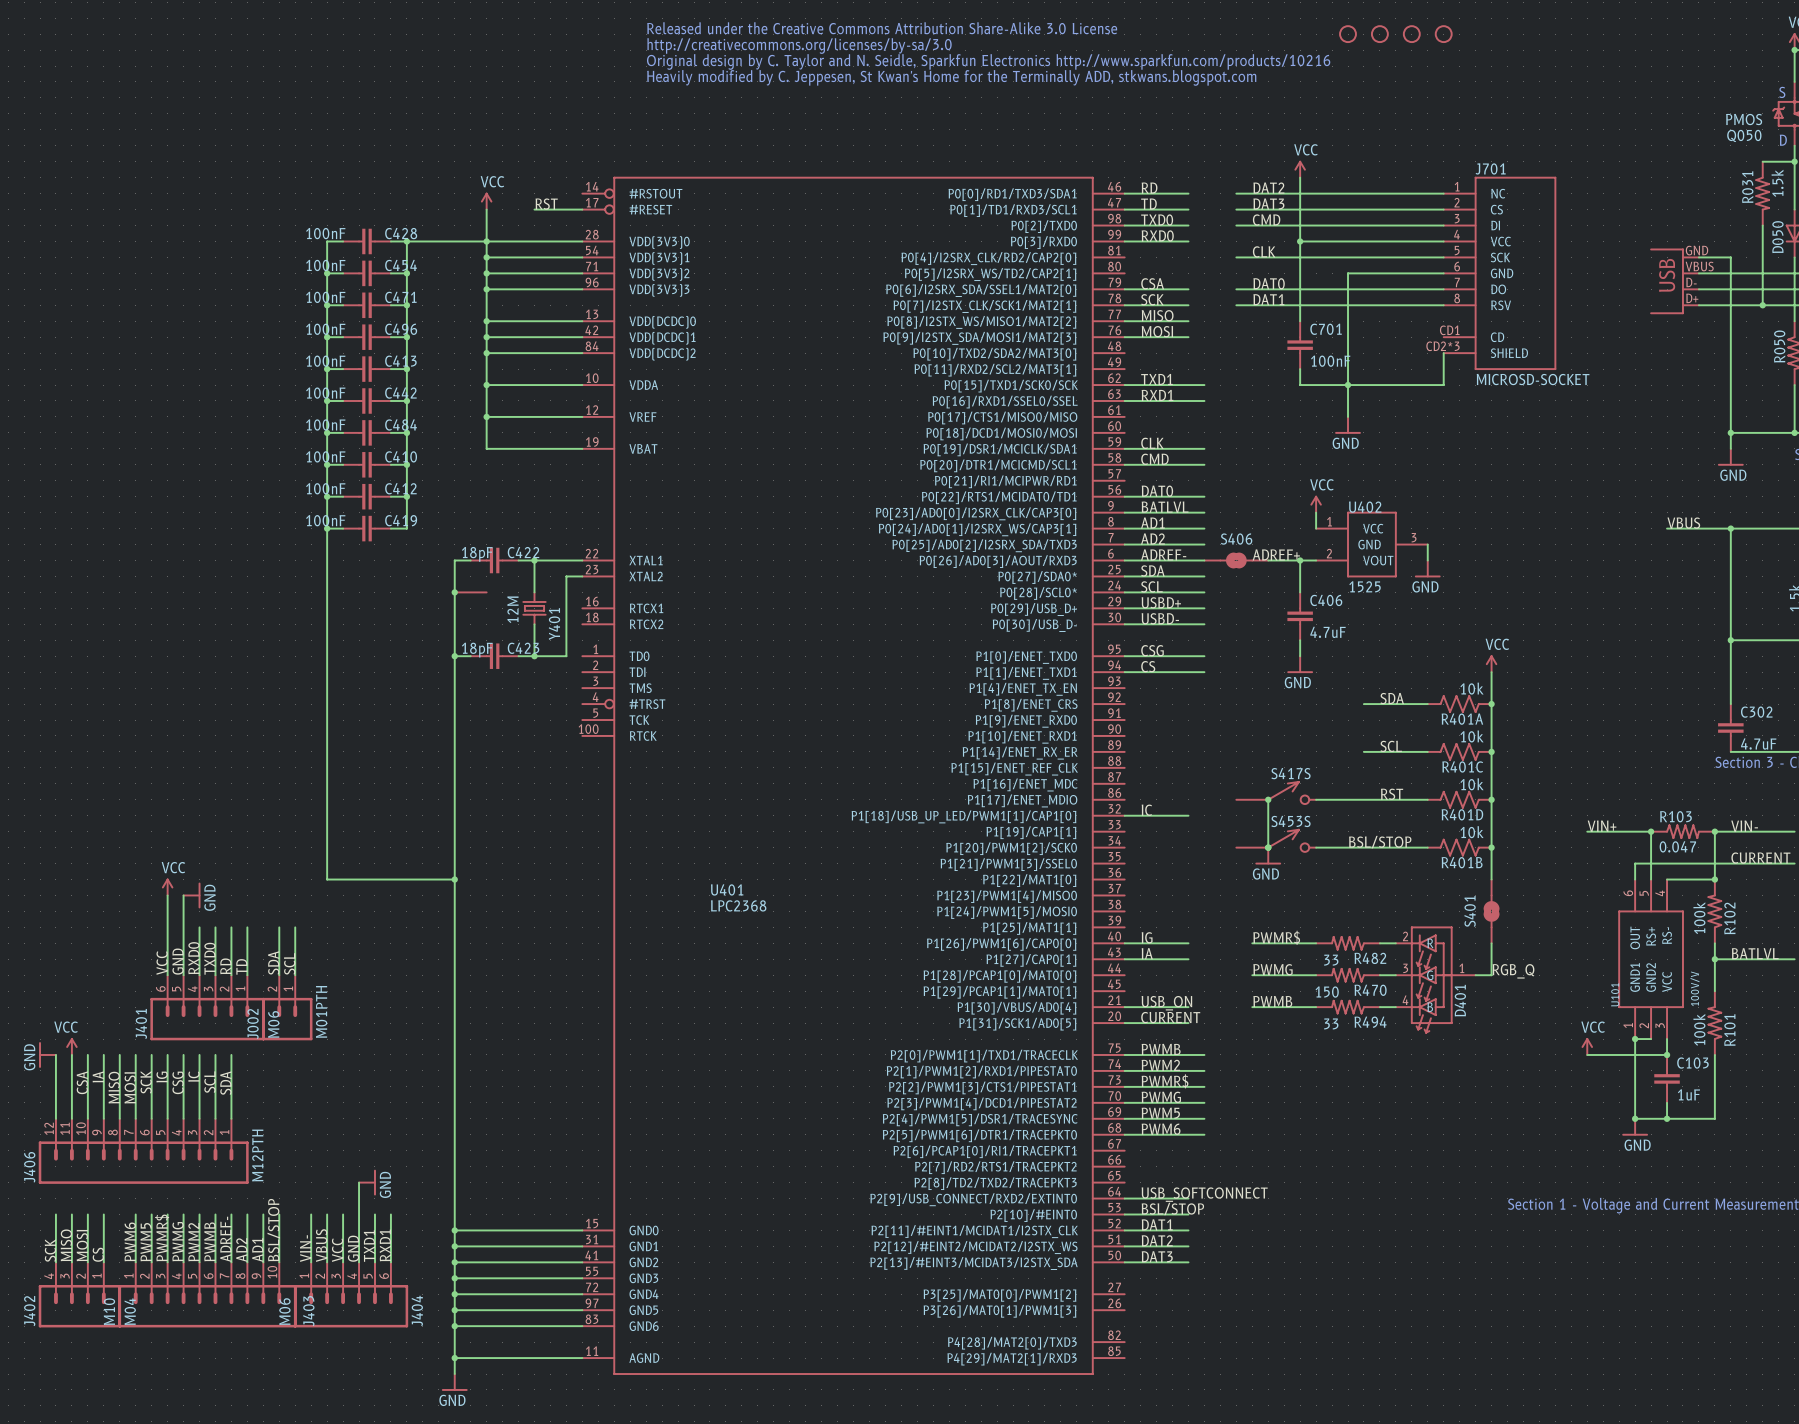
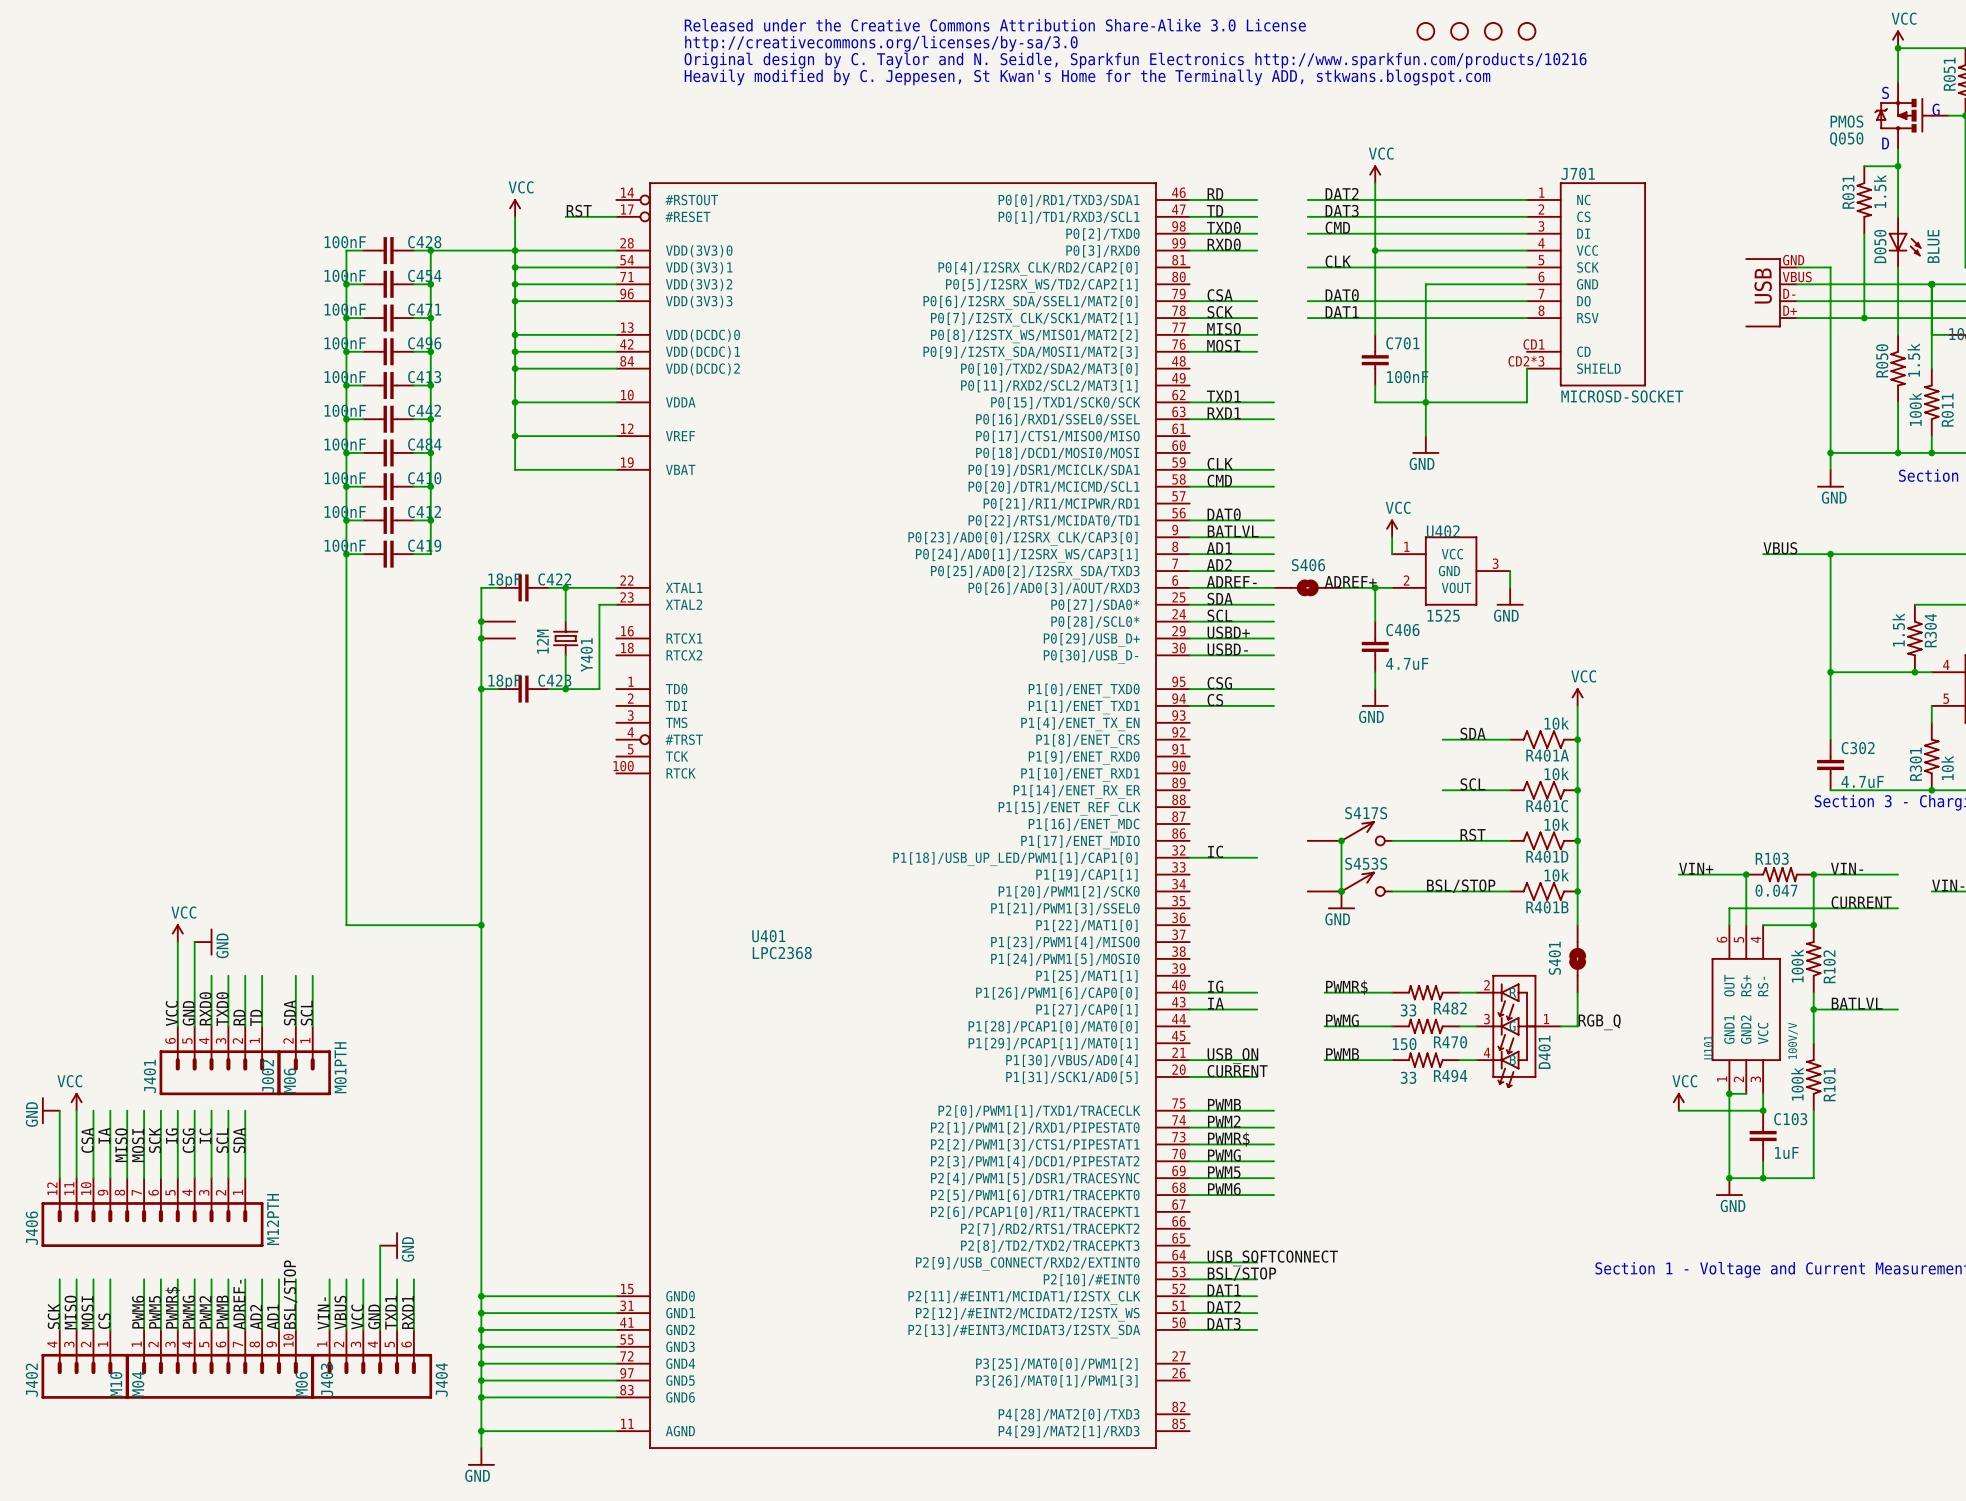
junction: none -> (481, 638)
part: none -> (498, 638)

